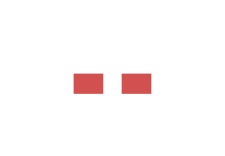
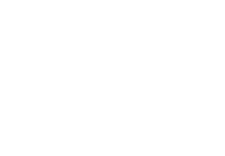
part: (112, 83) -> none

